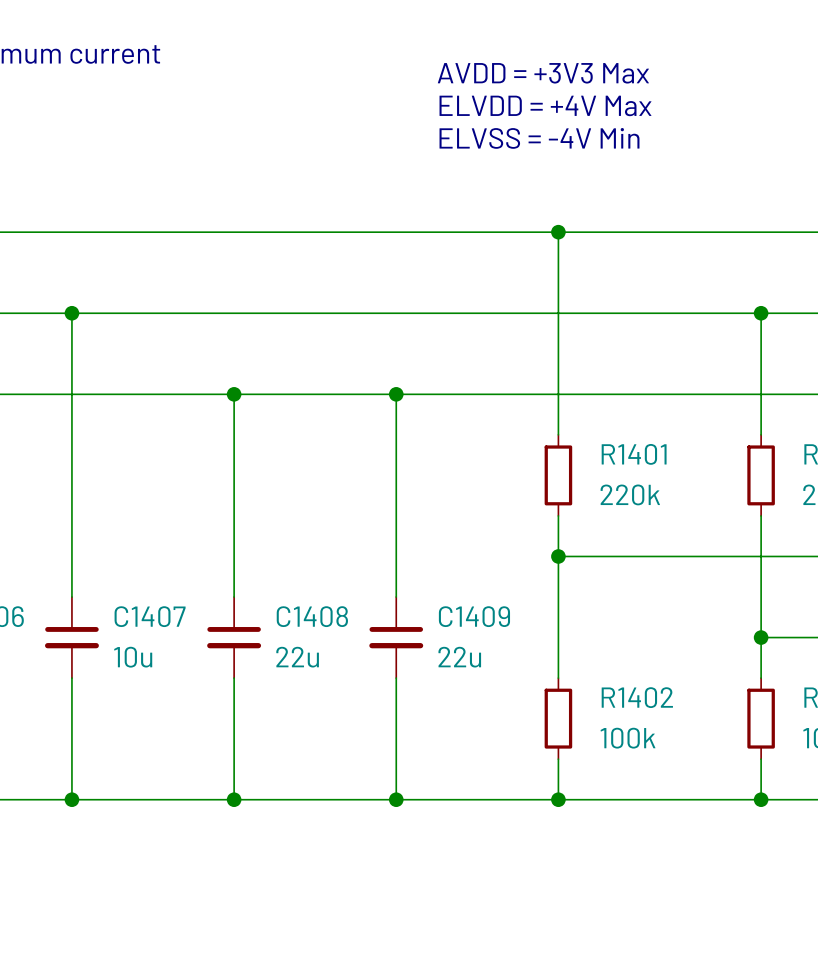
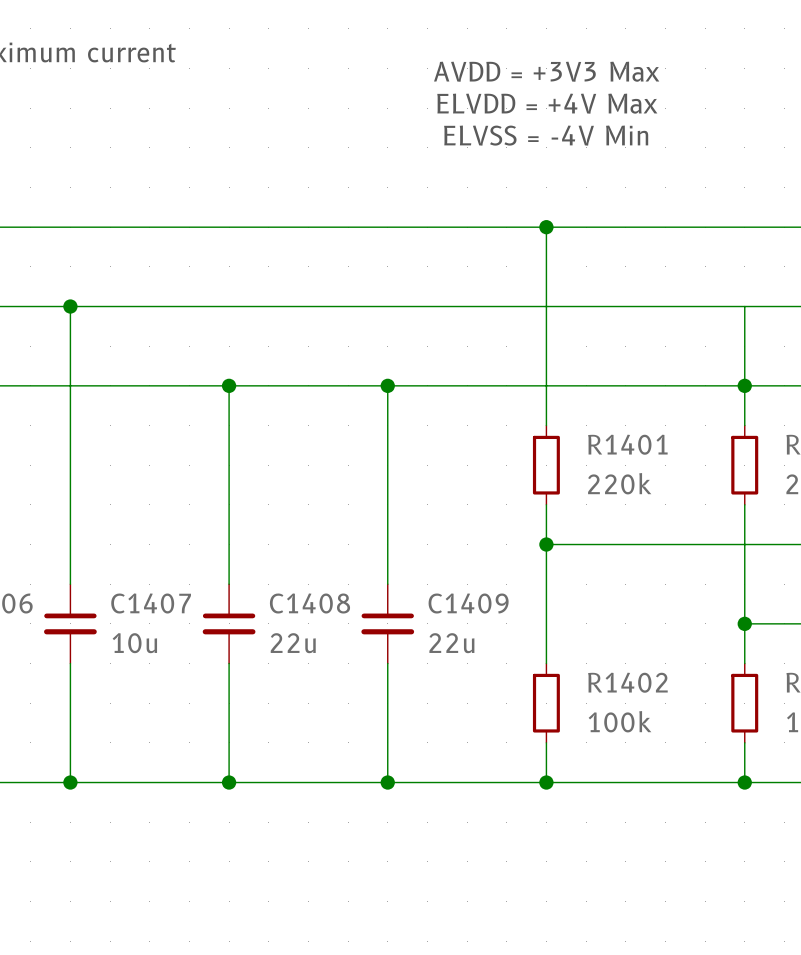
text position: AVDD = +3V3 Max (543, 73) -> AVDD = +3V3 Max (546, 71)
text position: ELVDD = +4V Max (545, 105) -> ELVDD = +4V Max (547, 103)
text position: ELVSS = -4V Min (539, 138) -> ELVSS = -4V Min (546, 135)
junction position: (761, 313) -> (744, 385)

